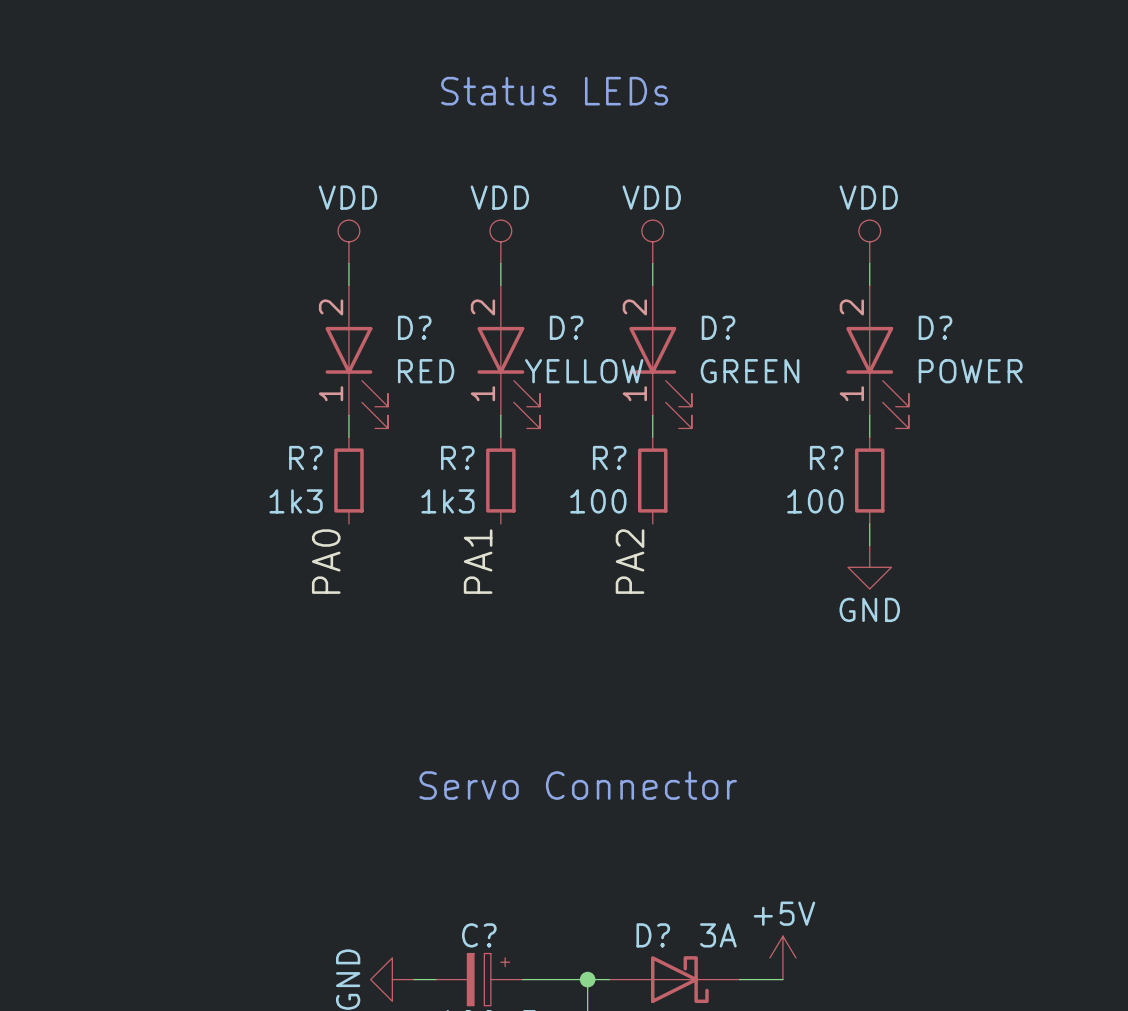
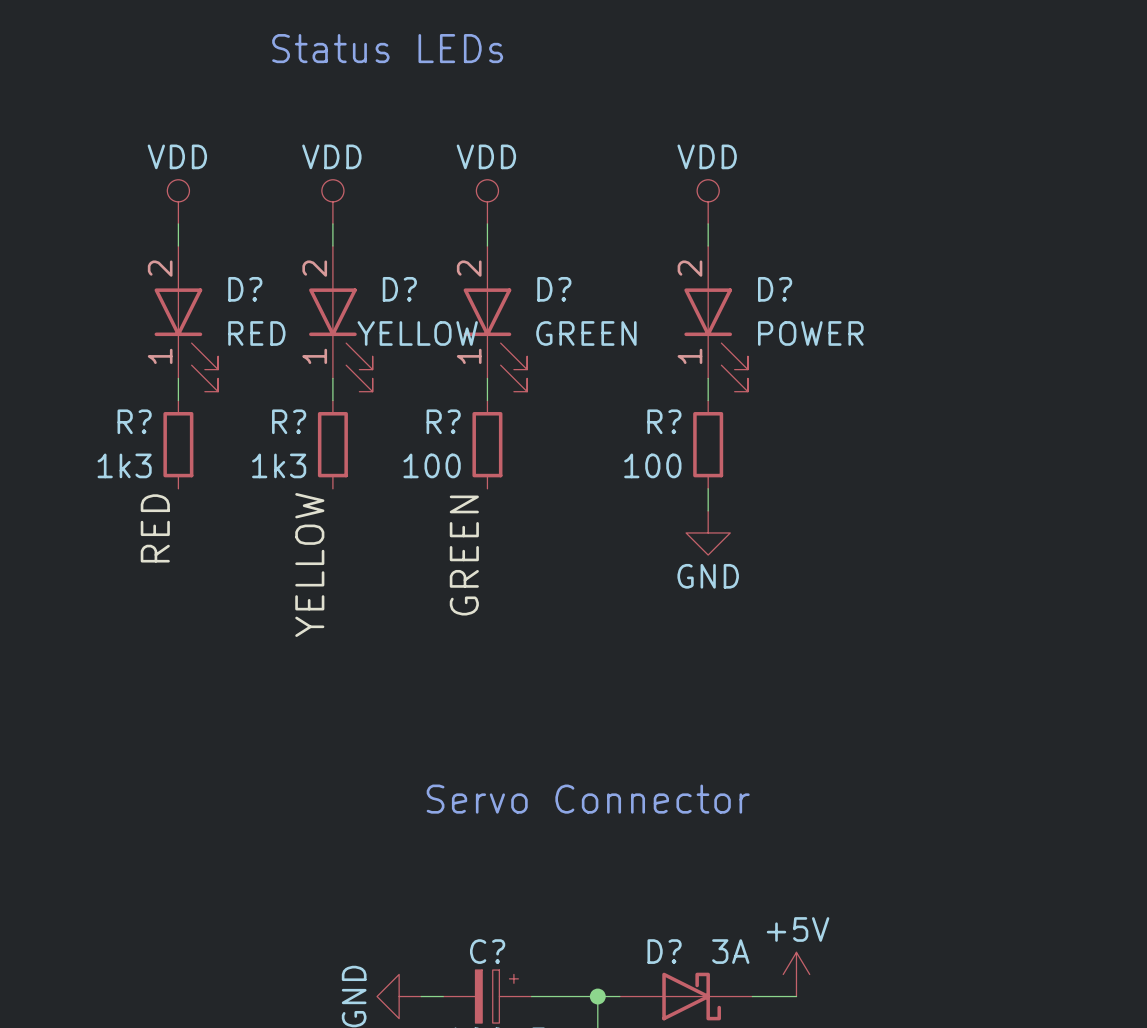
text position: Status LEDs (554, 91) -> Status LEDs (387, 48)
power symbol: none -> VDD (178, 201)
power symbol position: VDD (348, 241) -> VDD (332, 201)
power symbol position: VDD (500, 241) -> VDD (487, 201)
power symbol position: VDD (652, 241) -> VDD (708, 201)
power symbol: VDD (869, 241) -> none
wire: (348, 263) (348, 285) -> (178, 223) (178, 246)
wire: (500, 263) (500, 285) -> (332, 223) (332, 246)
wire: (652, 263) (652, 285) -> (487, 223) (487, 246)
wire: (869, 263) (869, 285) -> (708, 223) (708, 246)
D? position: (356, 356) -> (186, 318)
D? position: (508, 356) -> (340, 318)
D? position: (660, 356) -> (495, 318)
D? position: (877, 356) -> (716, 318)
wire: (348, 415) (348, 437) -> (178, 378) (178, 400)
wire: (500, 415) (500, 437) -> (332, 378) (332, 400)
wire: (652, 415) (652, 437) -> (487, 378) (487, 400)
wire: (869, 415) (869, 437) -> (708, 378) (708, 400)
R?: none -> 1k3 (178, 444)
R?: none -> 100 (487, 444)
R? position: (348, 480) -> (332, 444)
R?: 1k3 (500, 480) -> none
R? position: (652, 480) -> (708, 444)
R?: 100 (869, 480) -> none
label: none -> RED (155, 528)
wire: (869, 523) (869, 545) -> (708, 488) (708, 510)
label: none -> GREEN (464, 555)
label: none -> YELLOW (309, 564)
label: PA0 (326, 561) -> none
label: PA1 (478, 561) -> none
label: PA2 (630, 561) -> none
power symbol position: GND (869, 567) -> GND (708, 532)

